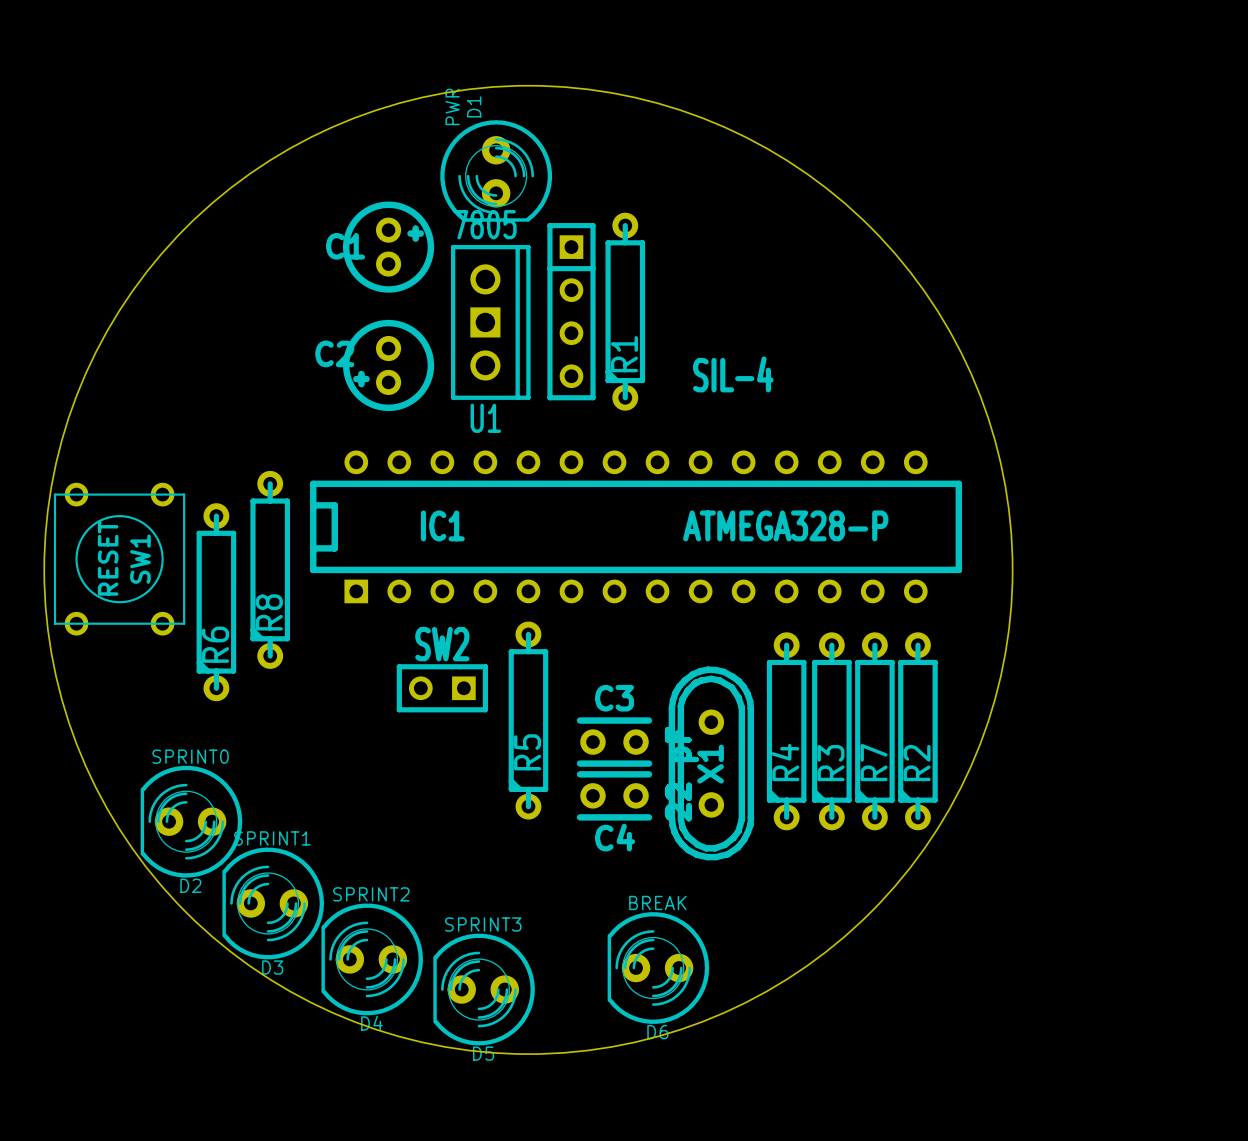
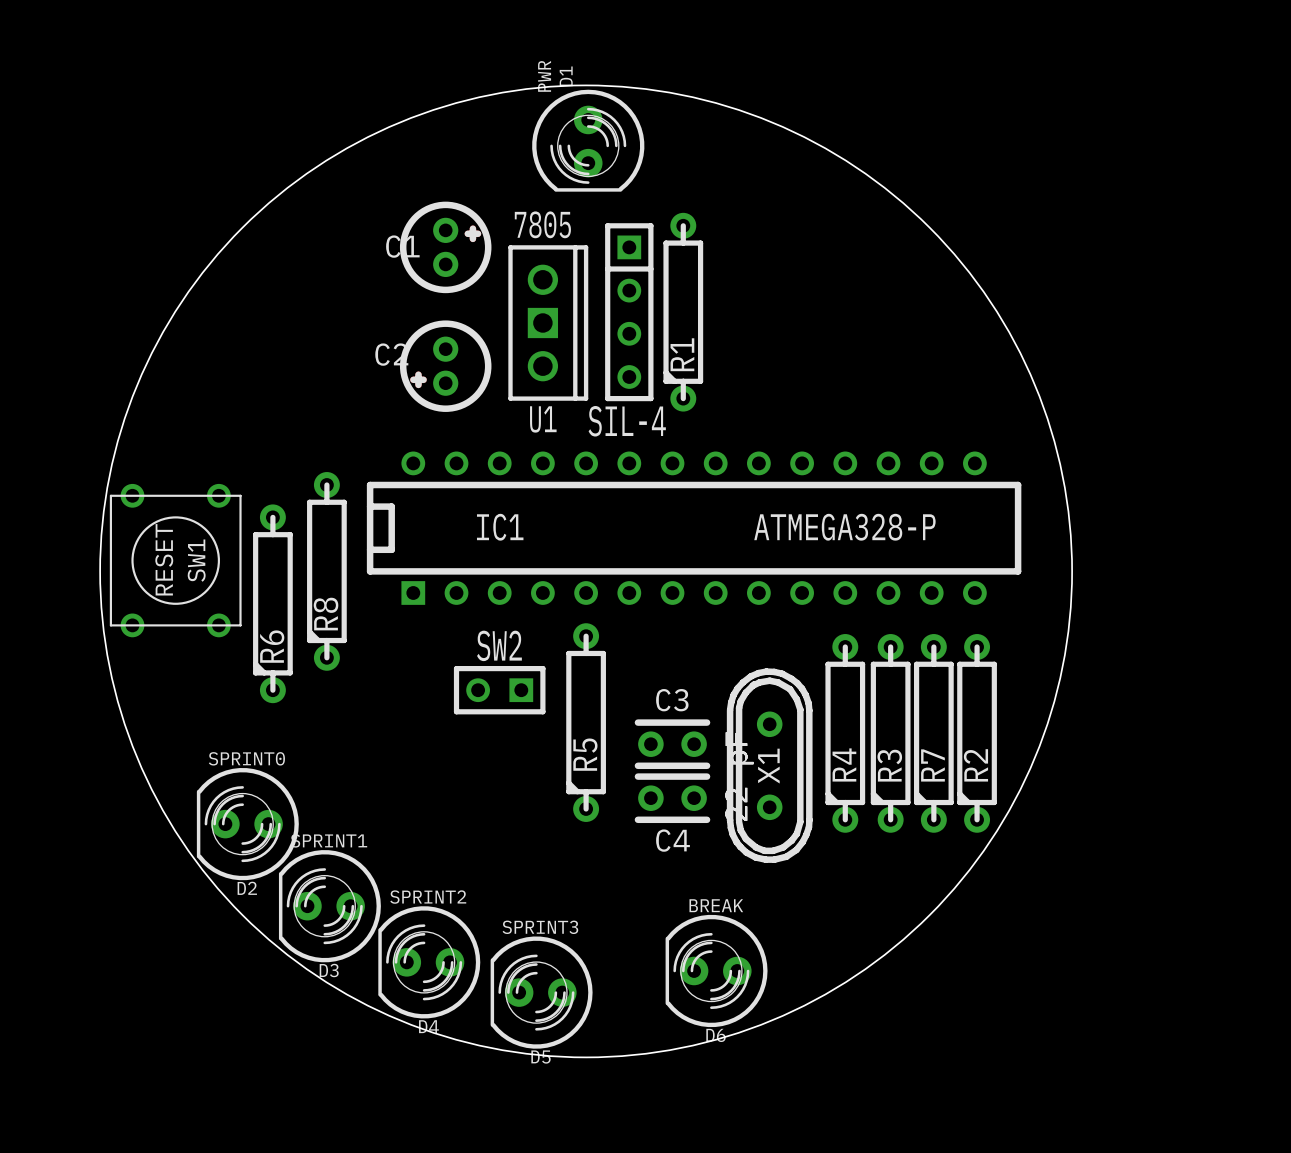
D1 position: (496, 170) -> (588, 140)
SIL-4 name position: SIL-4 (733, 374) -> SIL-4 (627, 421)

